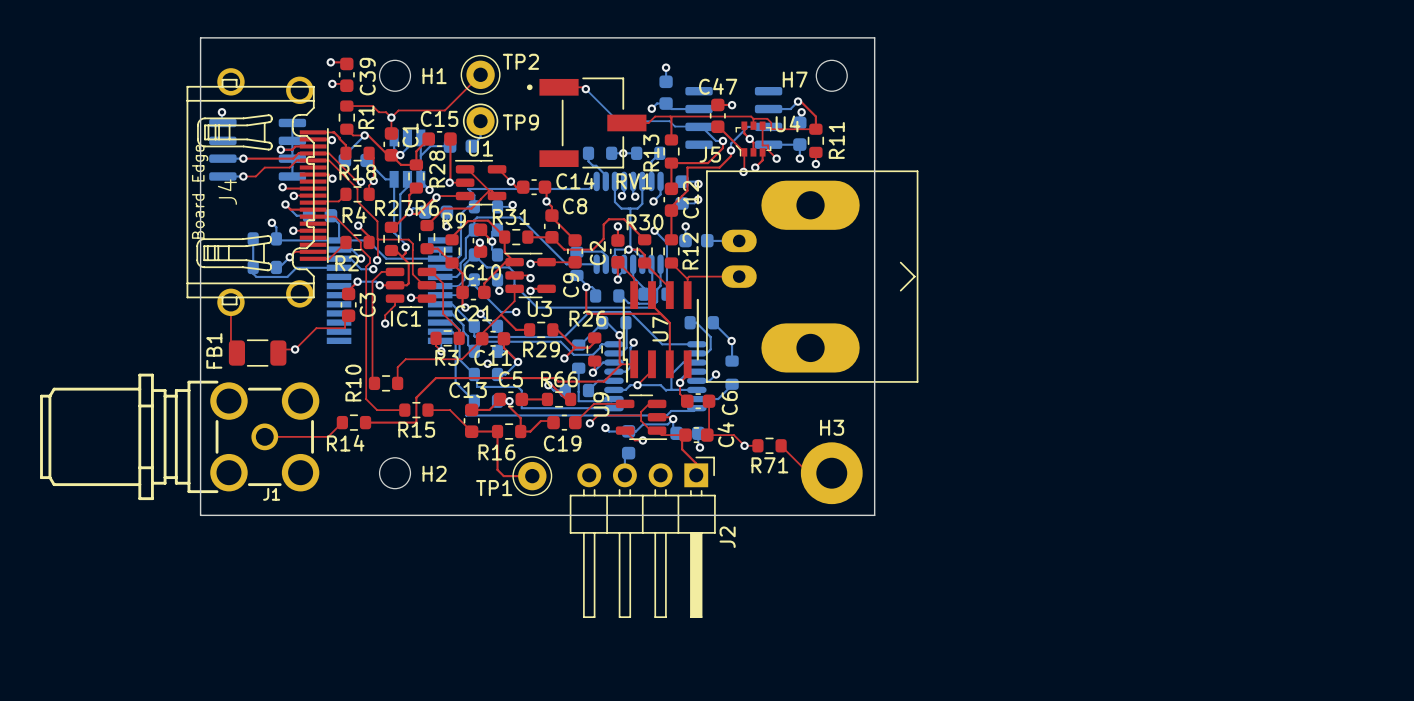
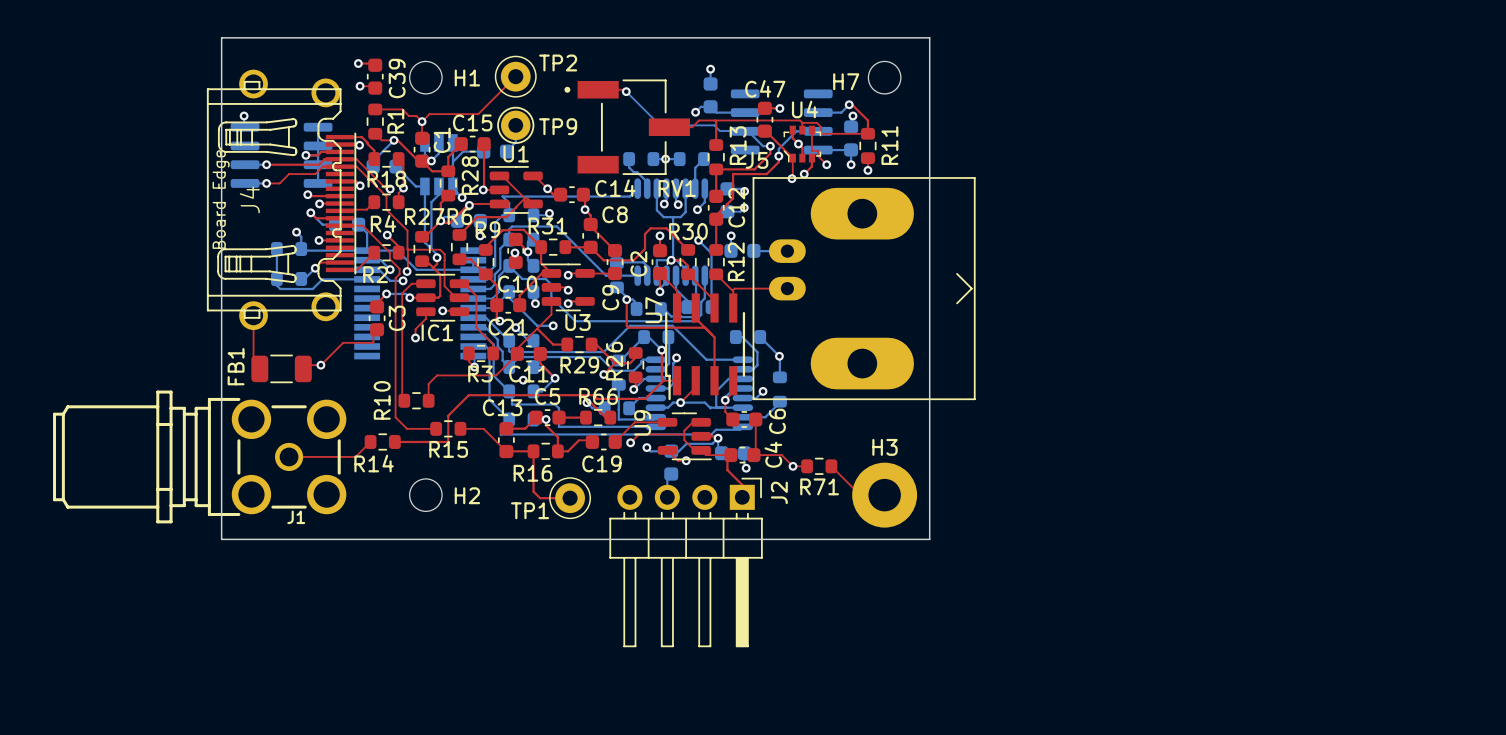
U4 name position: U4 (788, 123) -> U4 (804, 109)
R13 name position: R13 (651, 152) -> R13 (738, 145)
R26 name rotation: 0° (587, 318) -> 90° counterclockwise (614, 361)
U7 name position: U7 (660, 329) -> U7 (653, 310)
J2 name position: J2 (727, 537) -> J2 (779, 492)

